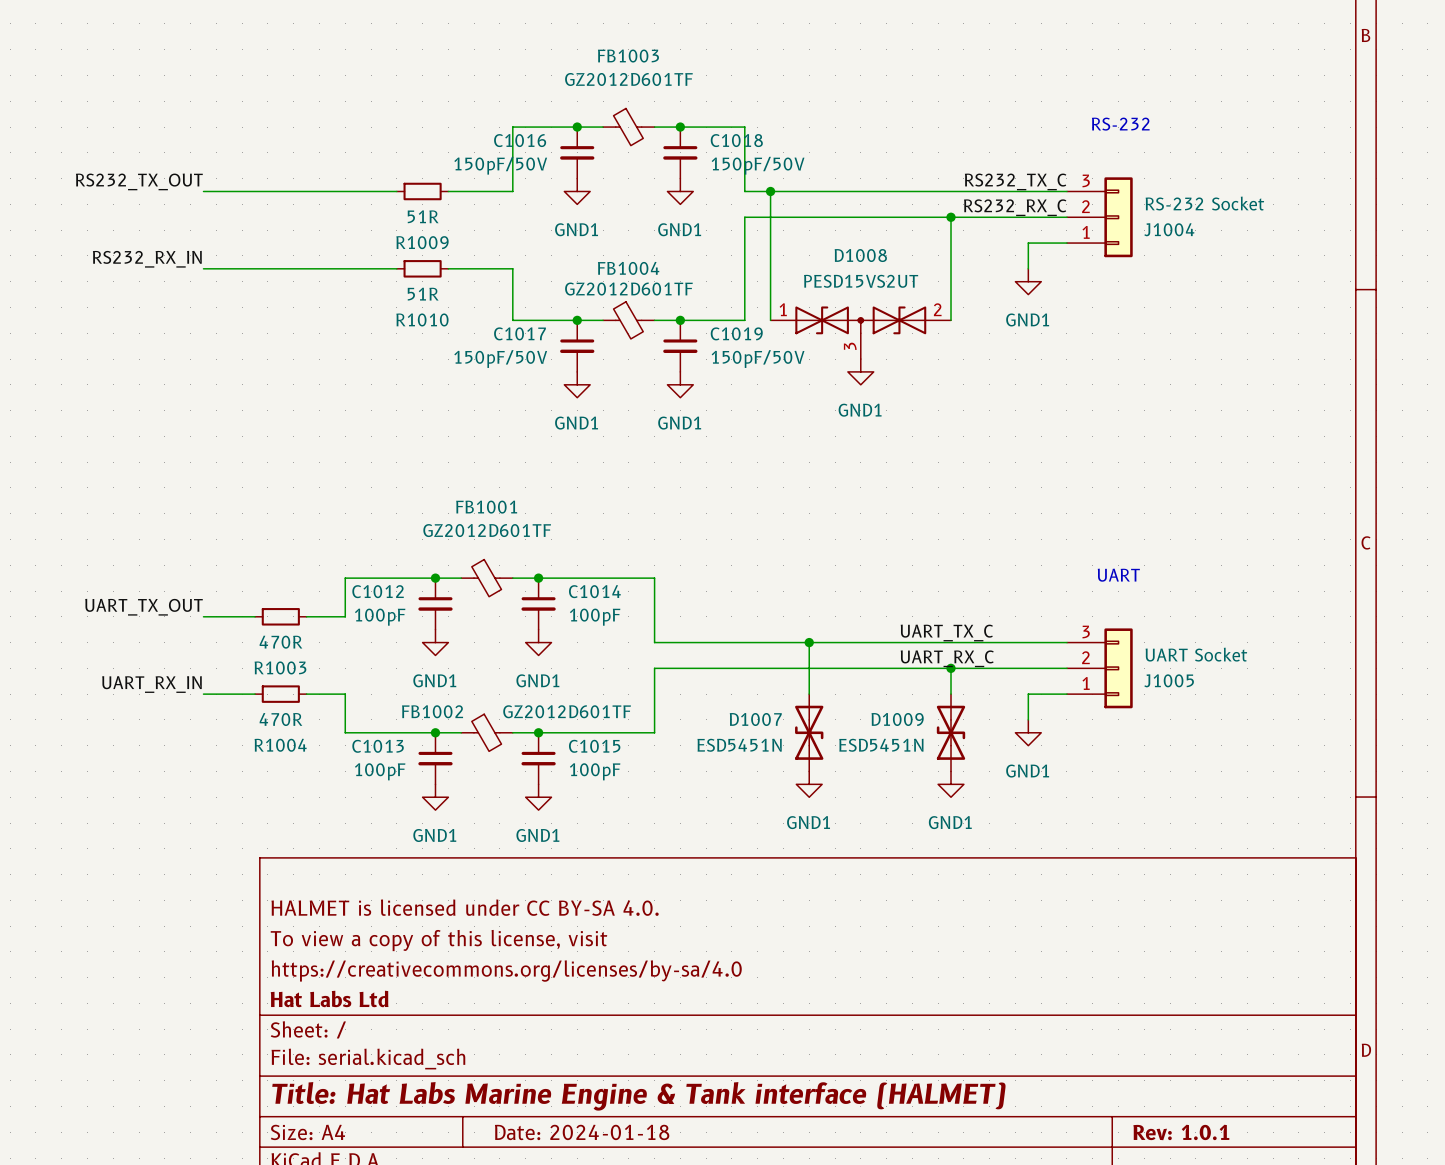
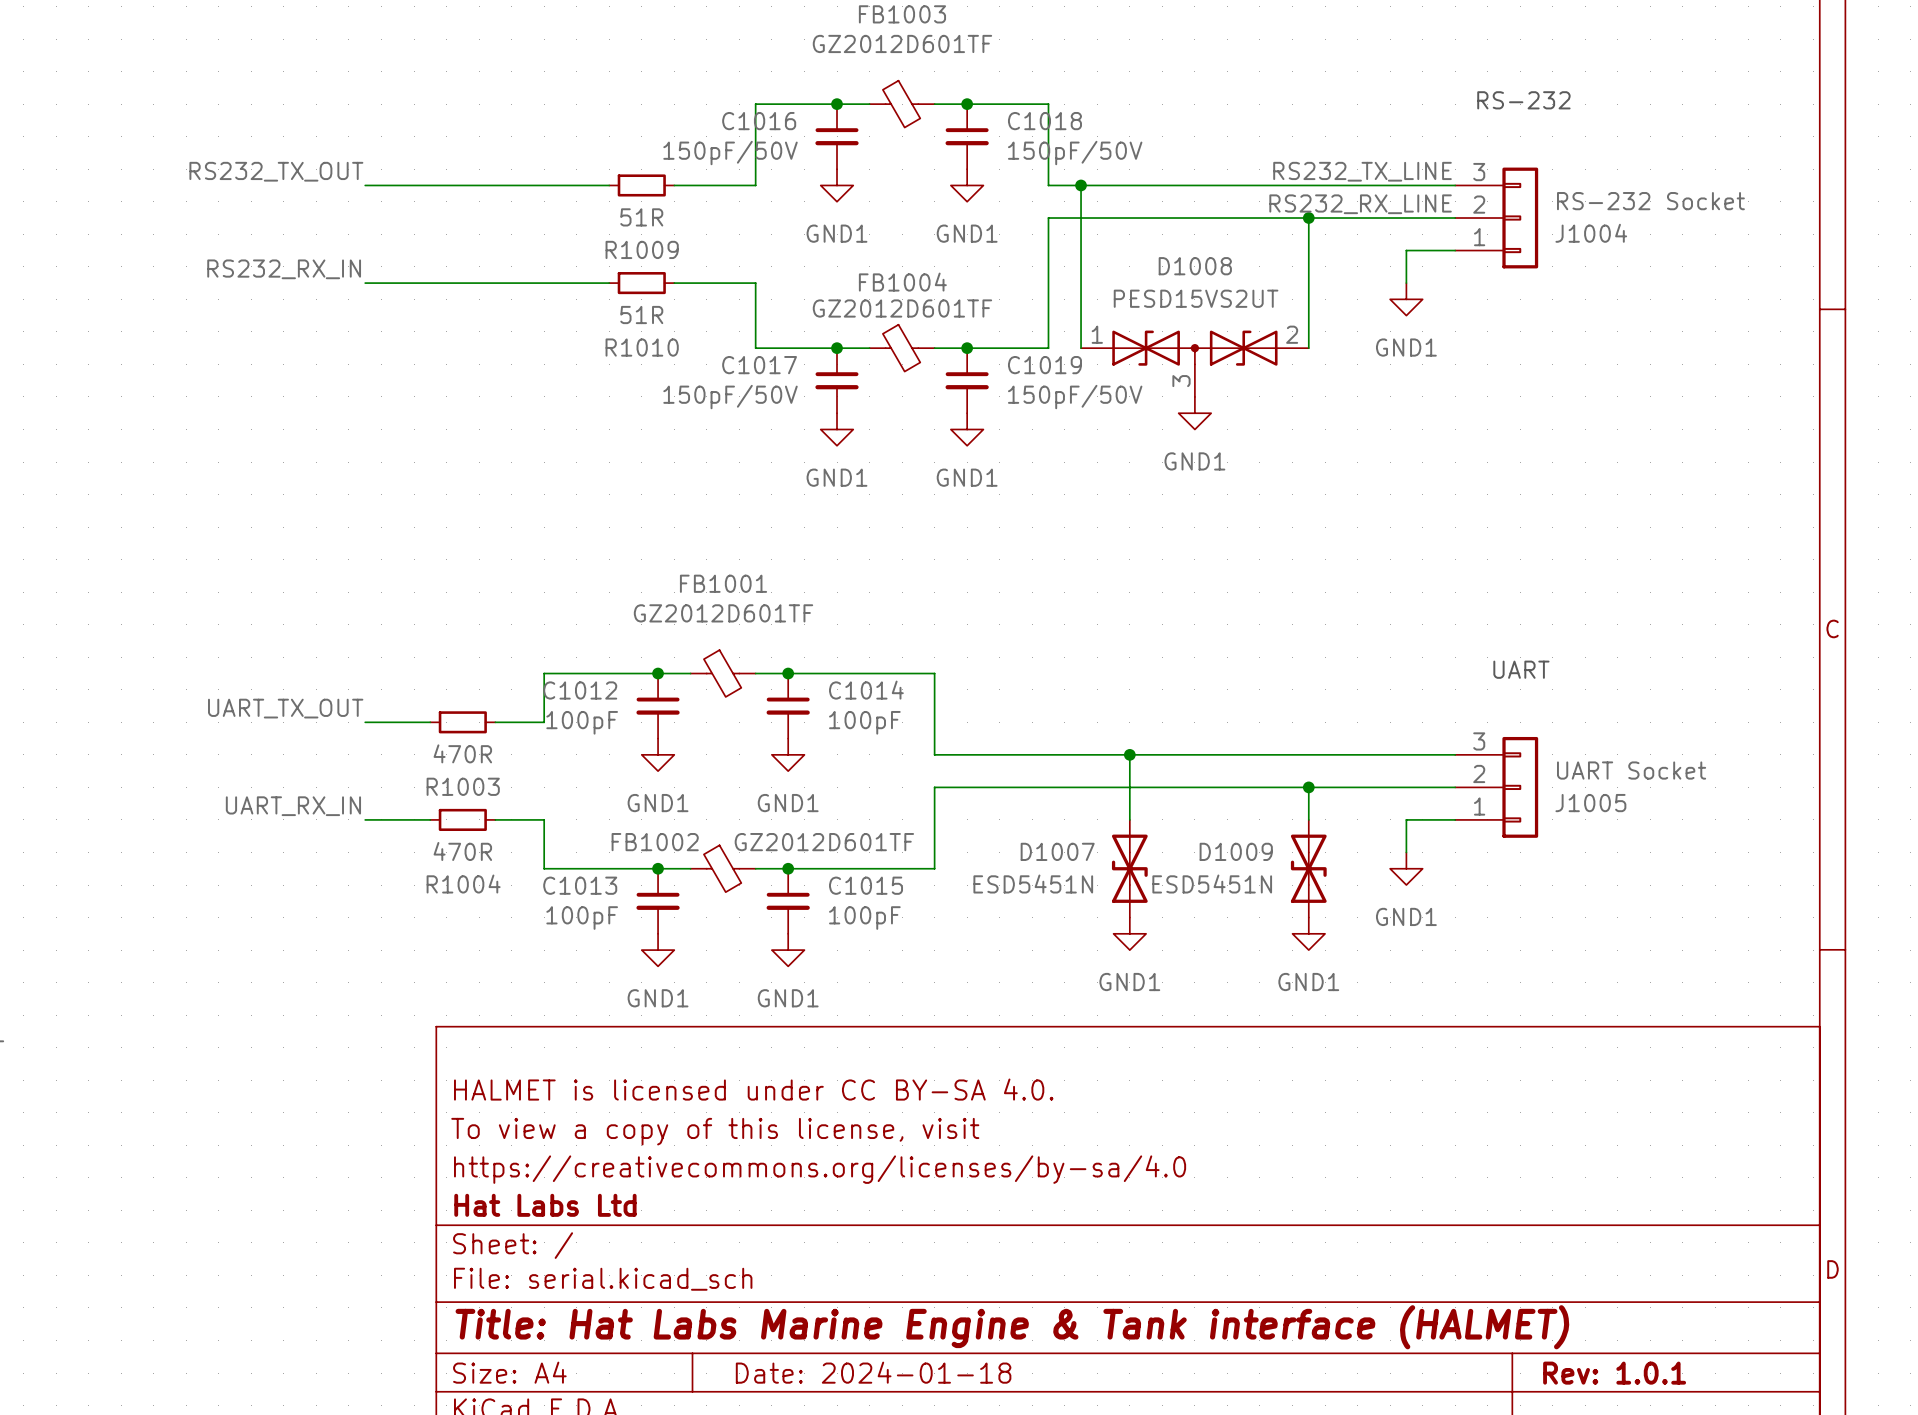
label: RS232_TX_C (1015, 181) -> RS232_TX_LINE (1362, 171)
label: RS232_RX_C (1015, 207) -> RS232_RX_LINE (1360, 204)
label: UART_TX_C (946, 633) -> none
label: UART_RX_C (947, 658) -> none

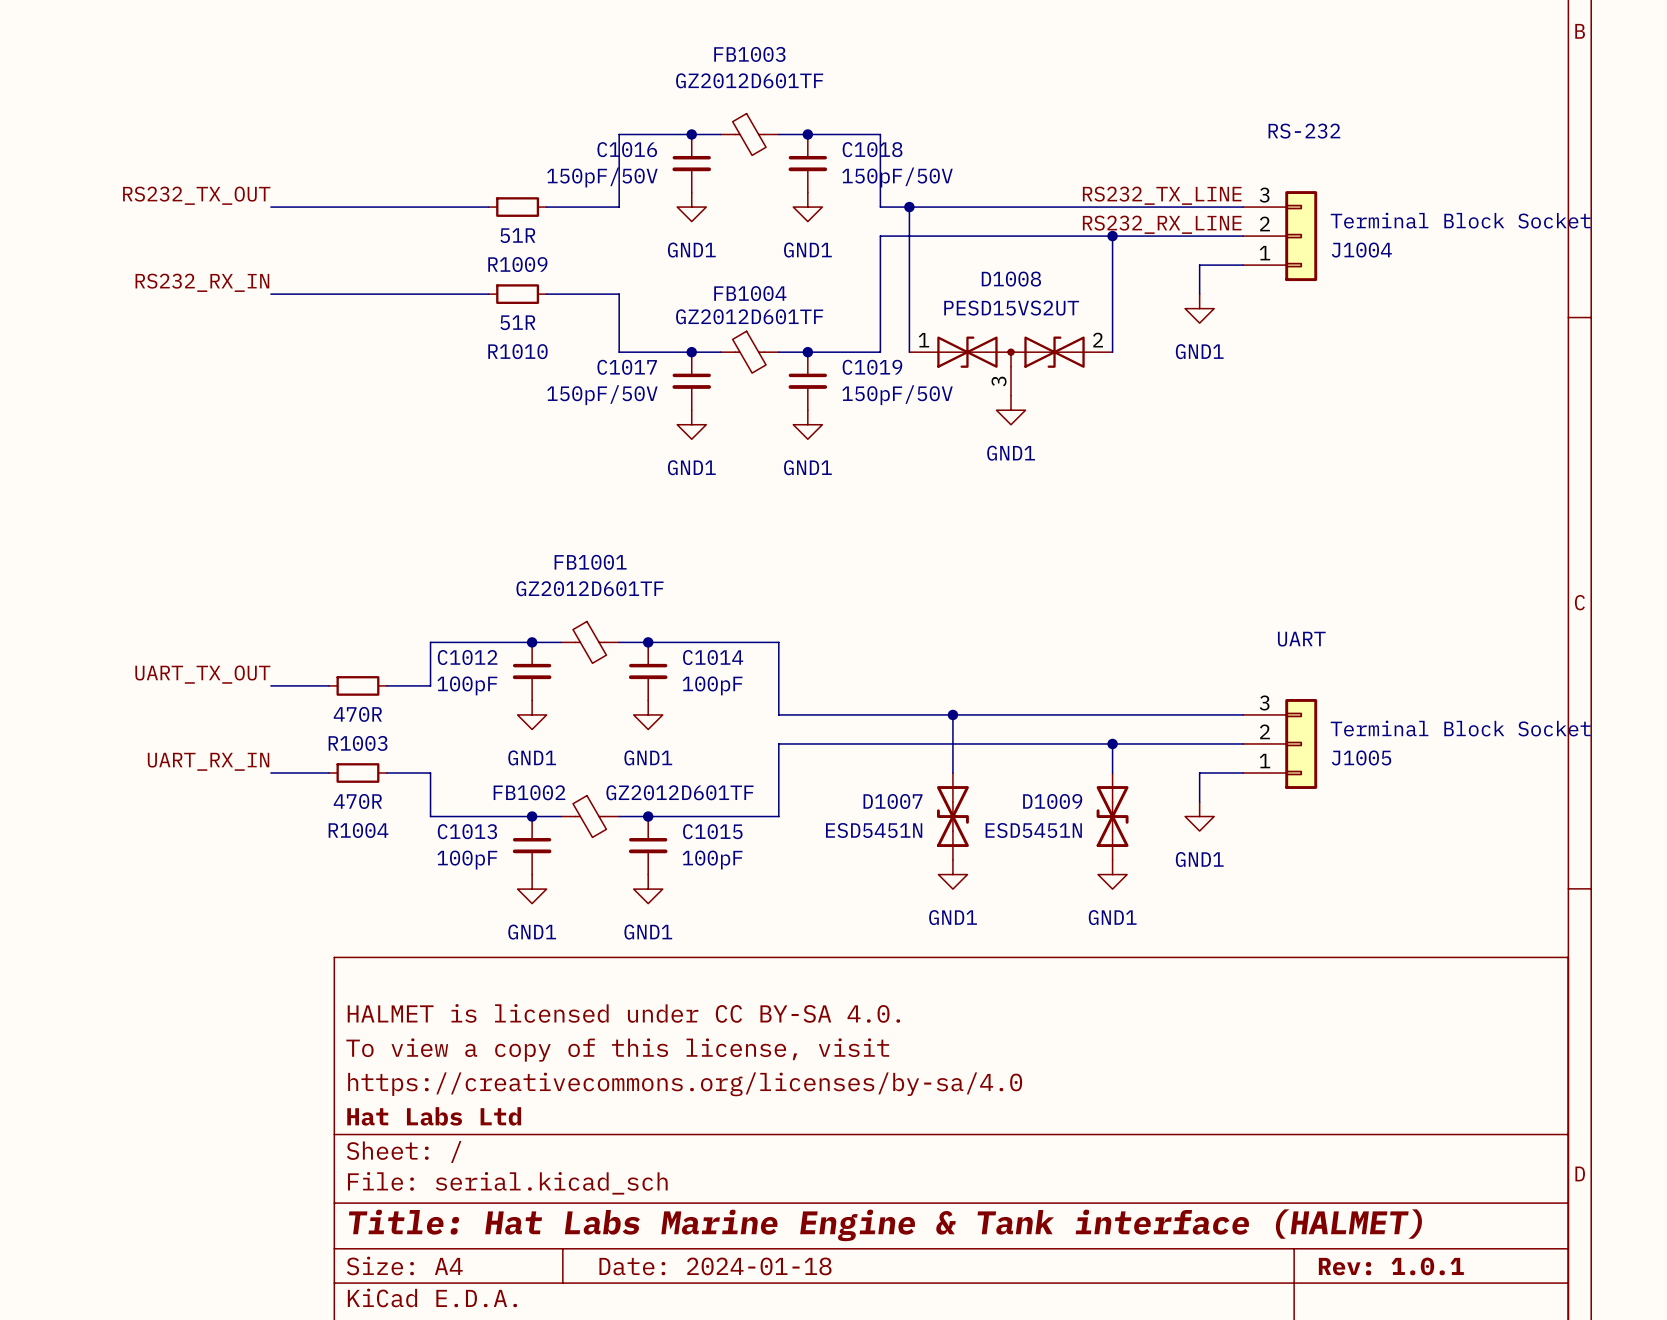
J1004 value: RS-232 Socket (1650, 201) -> Terminal Block Socket (1460, 220)
J1005 value: UART Socket (1631, 770) -> Terminal Block Socket (1460, 728)

